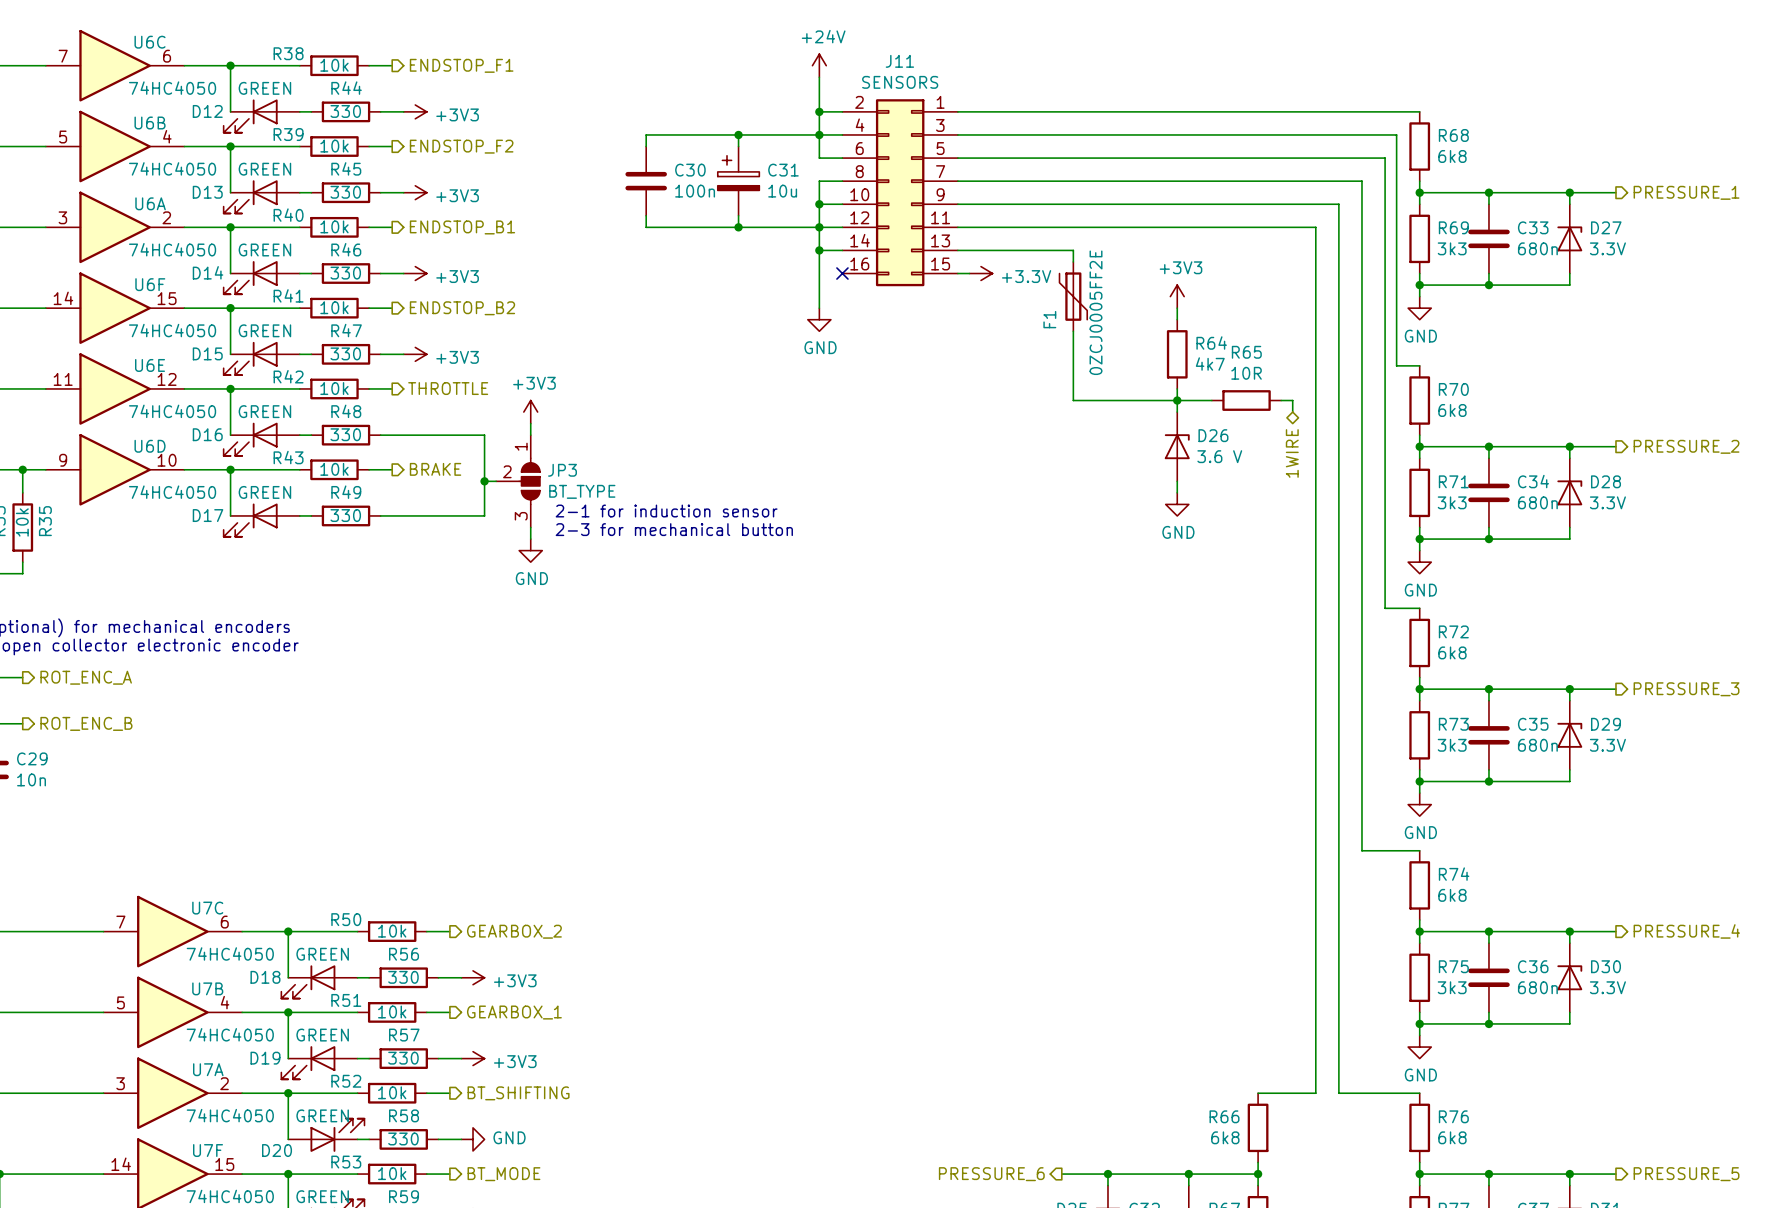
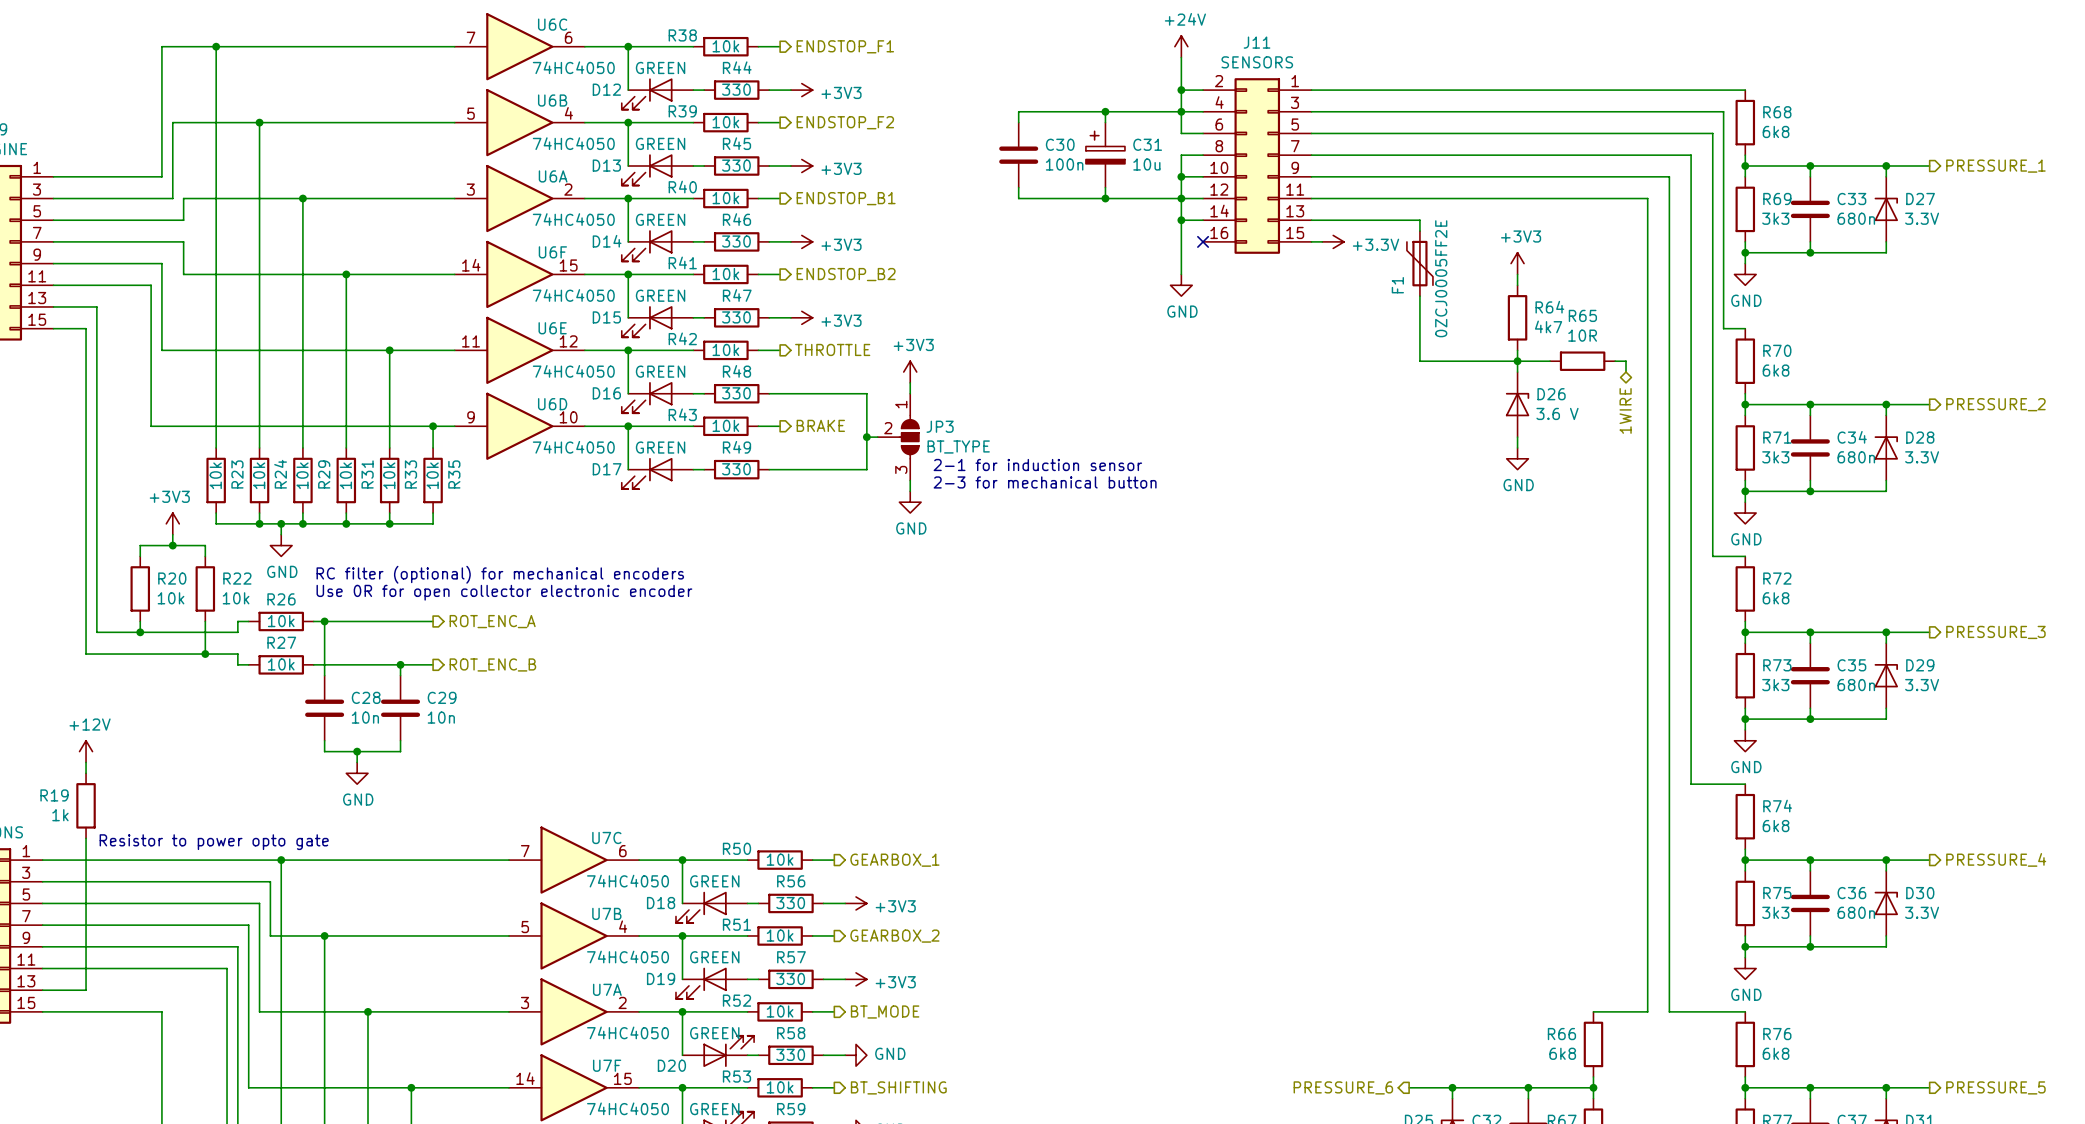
hierarchical label: GEARBOX_2 (514, 931) -> GEARBOX_1 (894, 860)
hierarchical label: GEARBOX_1 (514, 1012) -> GEARBOX_2 (894, 936)
hierarchical label: BT_SHIFTING (518, 1093) -> BT_MODE (885, 1012)
hierarchical label: BT_MODE (503, 1174) -> BT_SHIFTING (898, 1087)

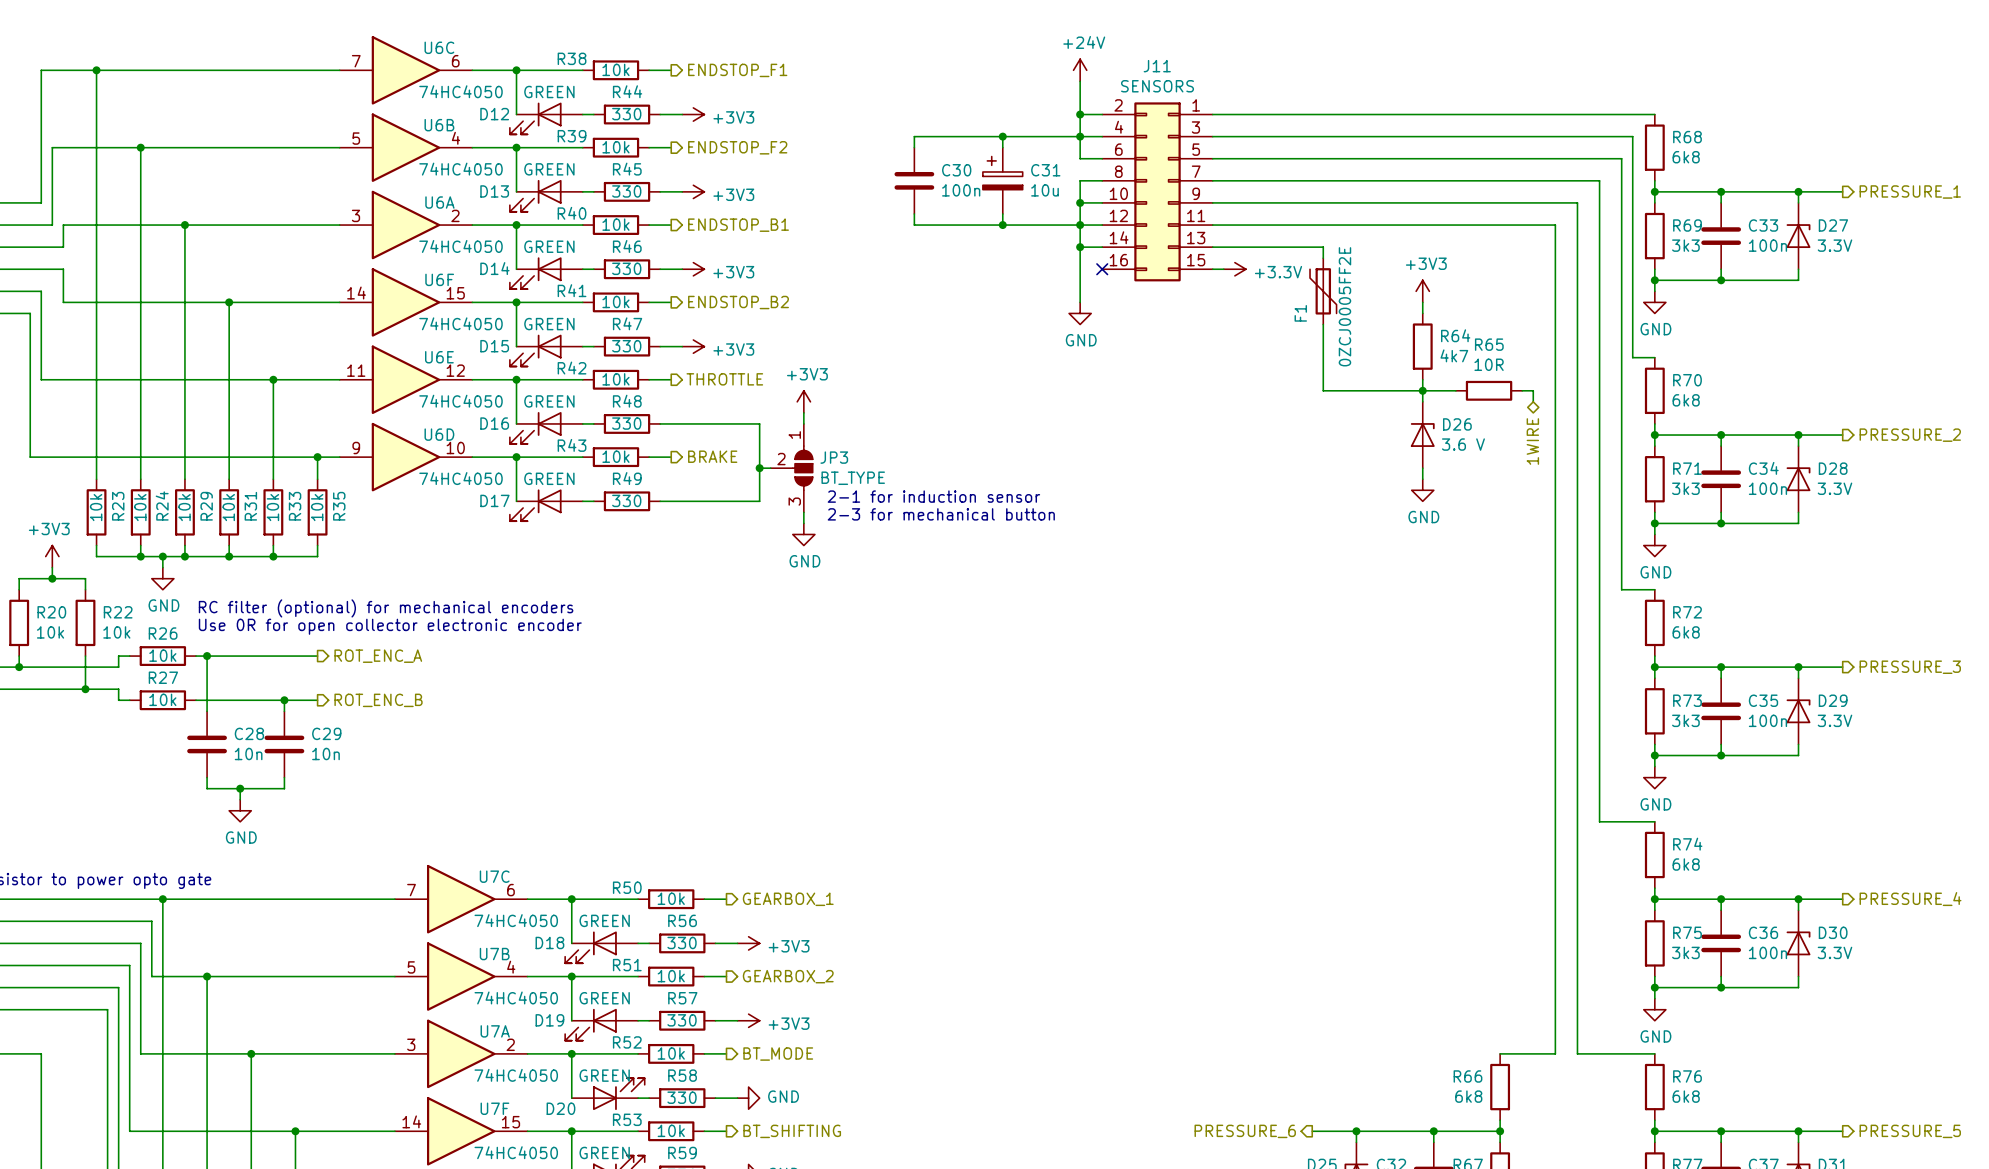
C33 value: 680n (1856, 218) -> 100n (1767, 245)
C34 value: 680n (1856, 457) -> 100n (1767, 488)
C35 value: 680n (1856, 685) -> 100n (1767, 720)
C36 value: 680n (1856, 912) -> 100n (1767, 952)

